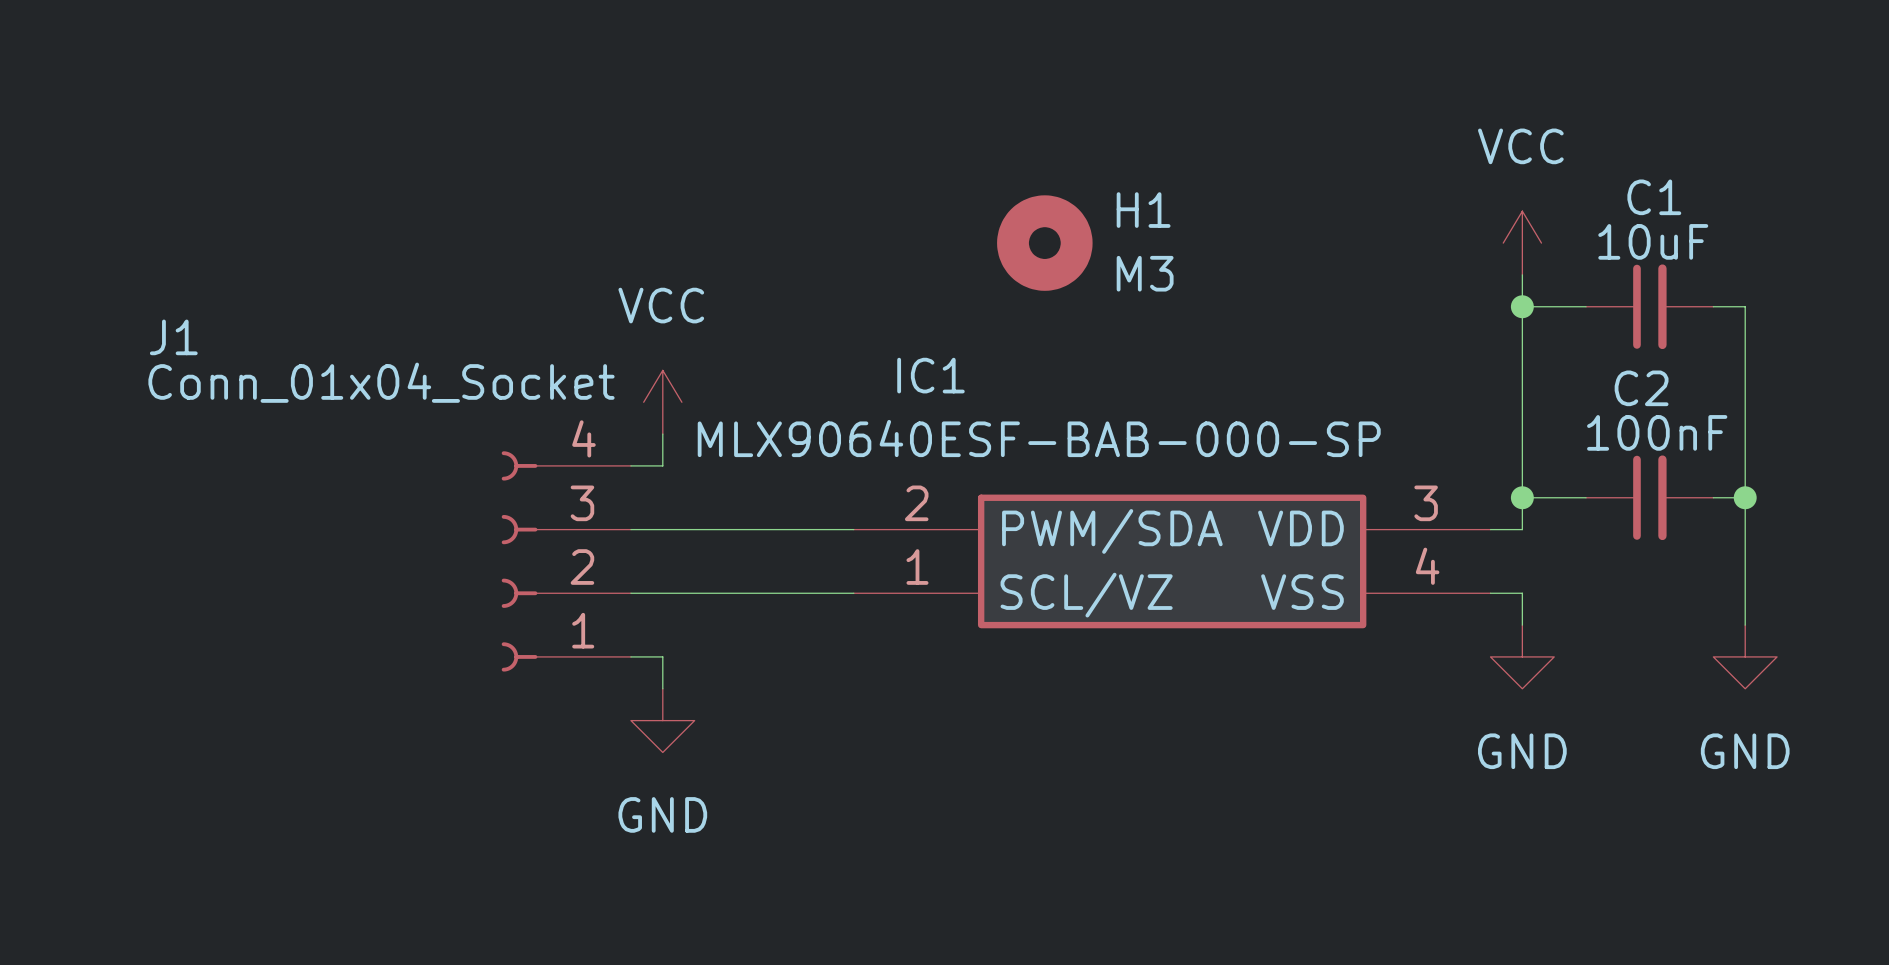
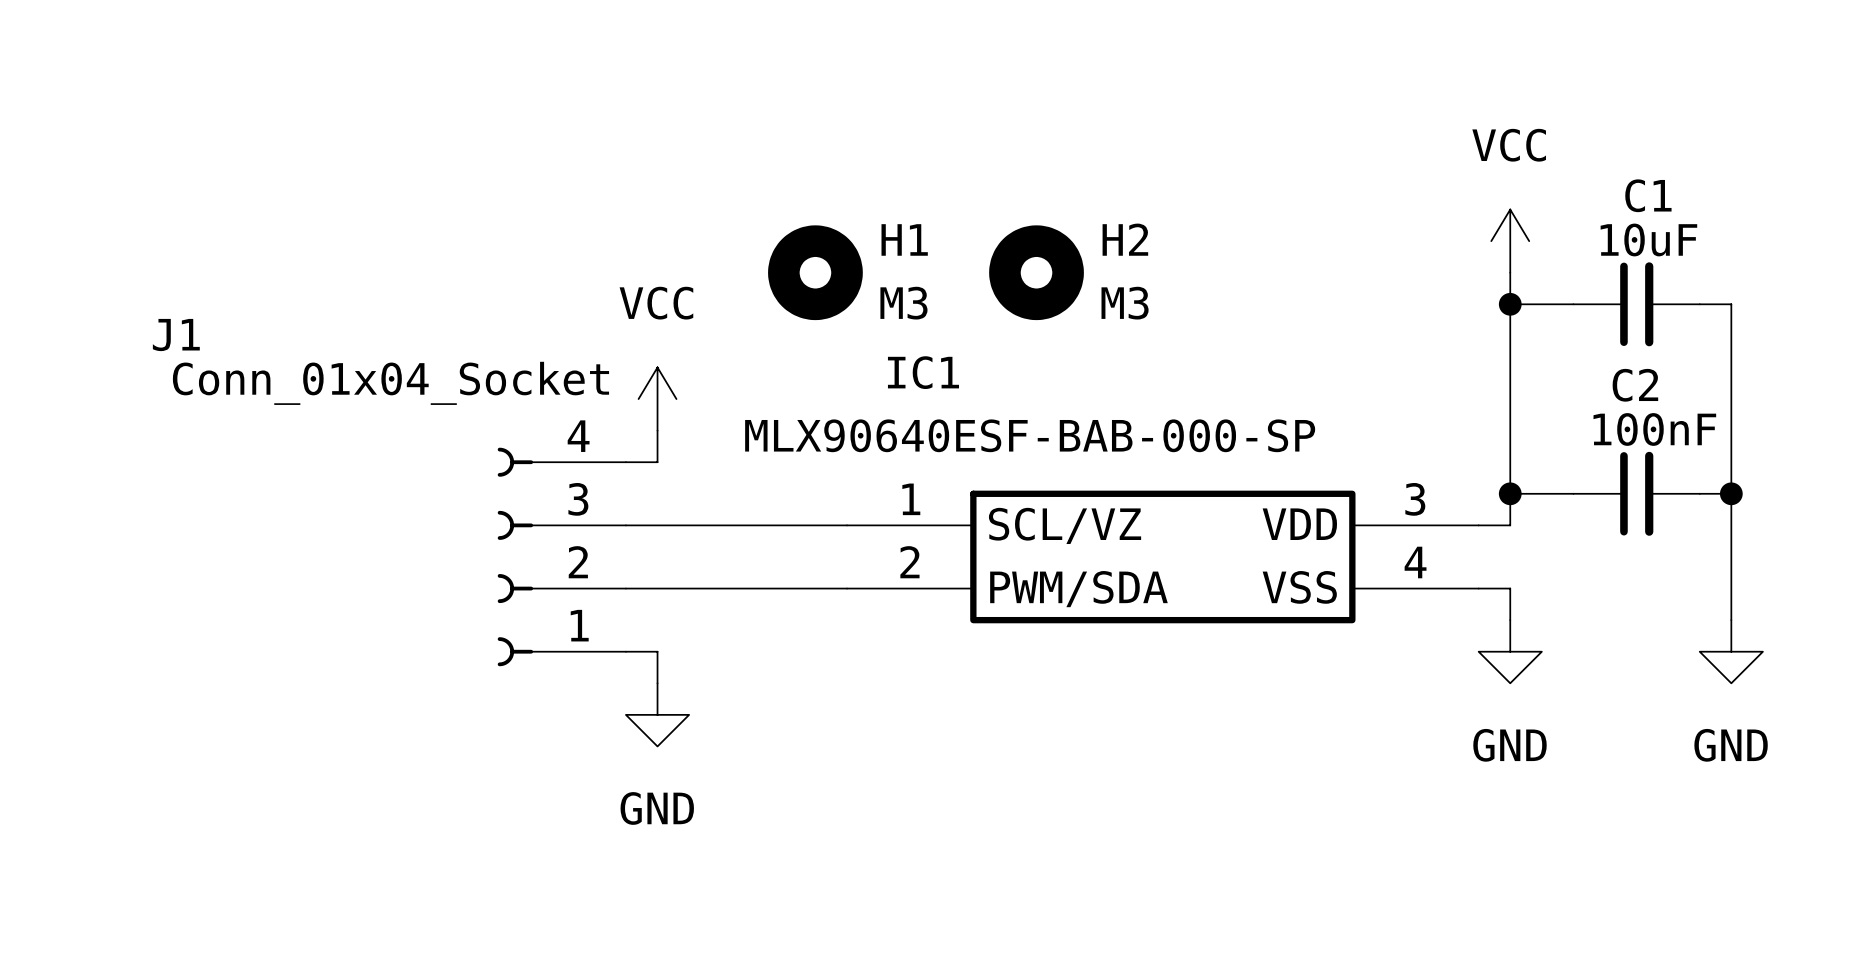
H1 position: (1044, 243) -> (815, 272)
H2: none -> M3 (1036, 272)
IC1 pin number: 2 (916, 503) -> 1 (911, 499)
IC1 pin name: PWM/SDA (1112, 531) -> SCL/VZ (1065, 525)
IC1 pin number: 1 (917, 567) -> 2 (909, 562)
IC1 pin name: SCL/VZ (1086, 595) -> PWM/SDA (1078, 589)

